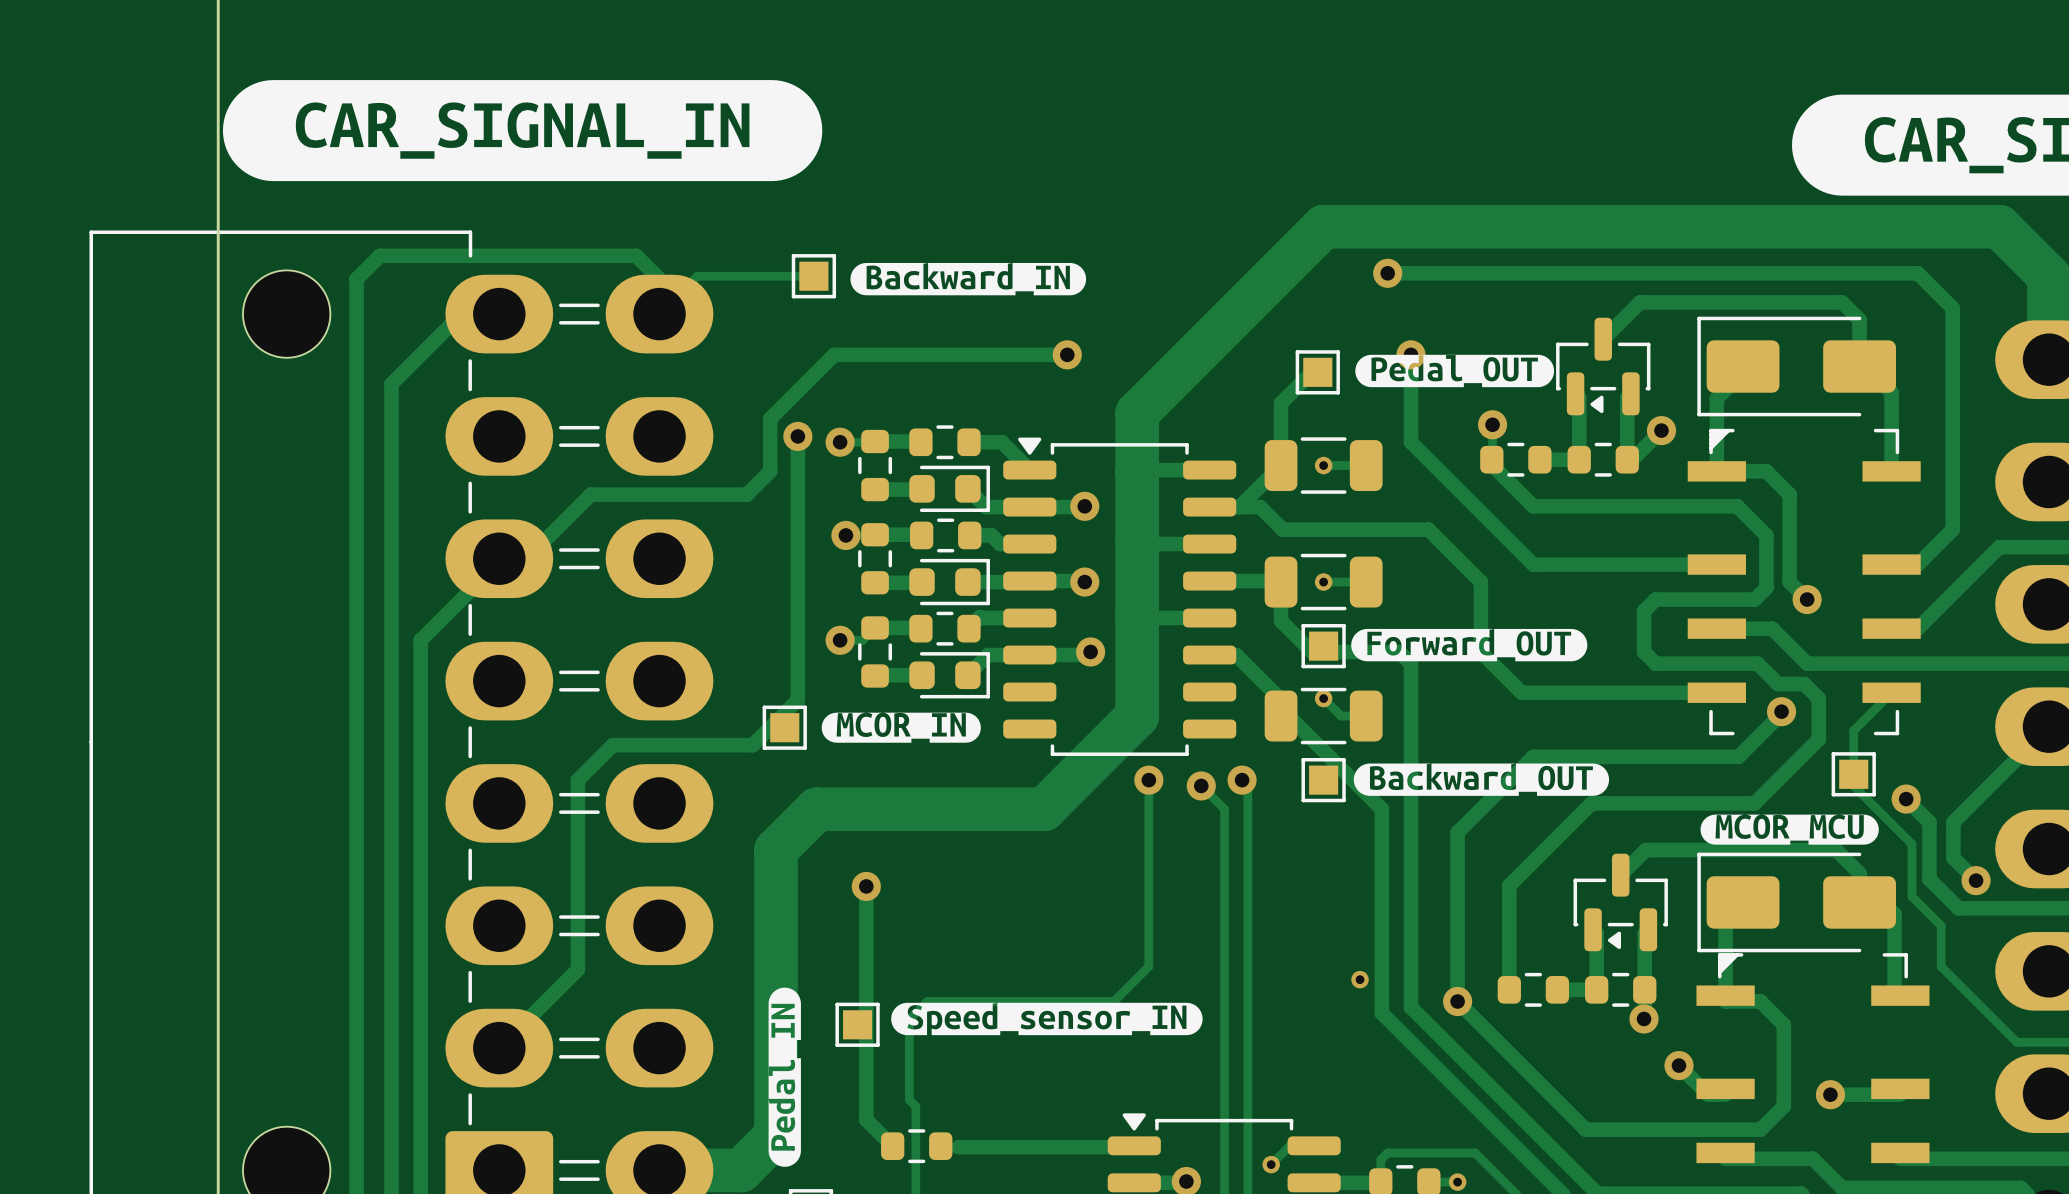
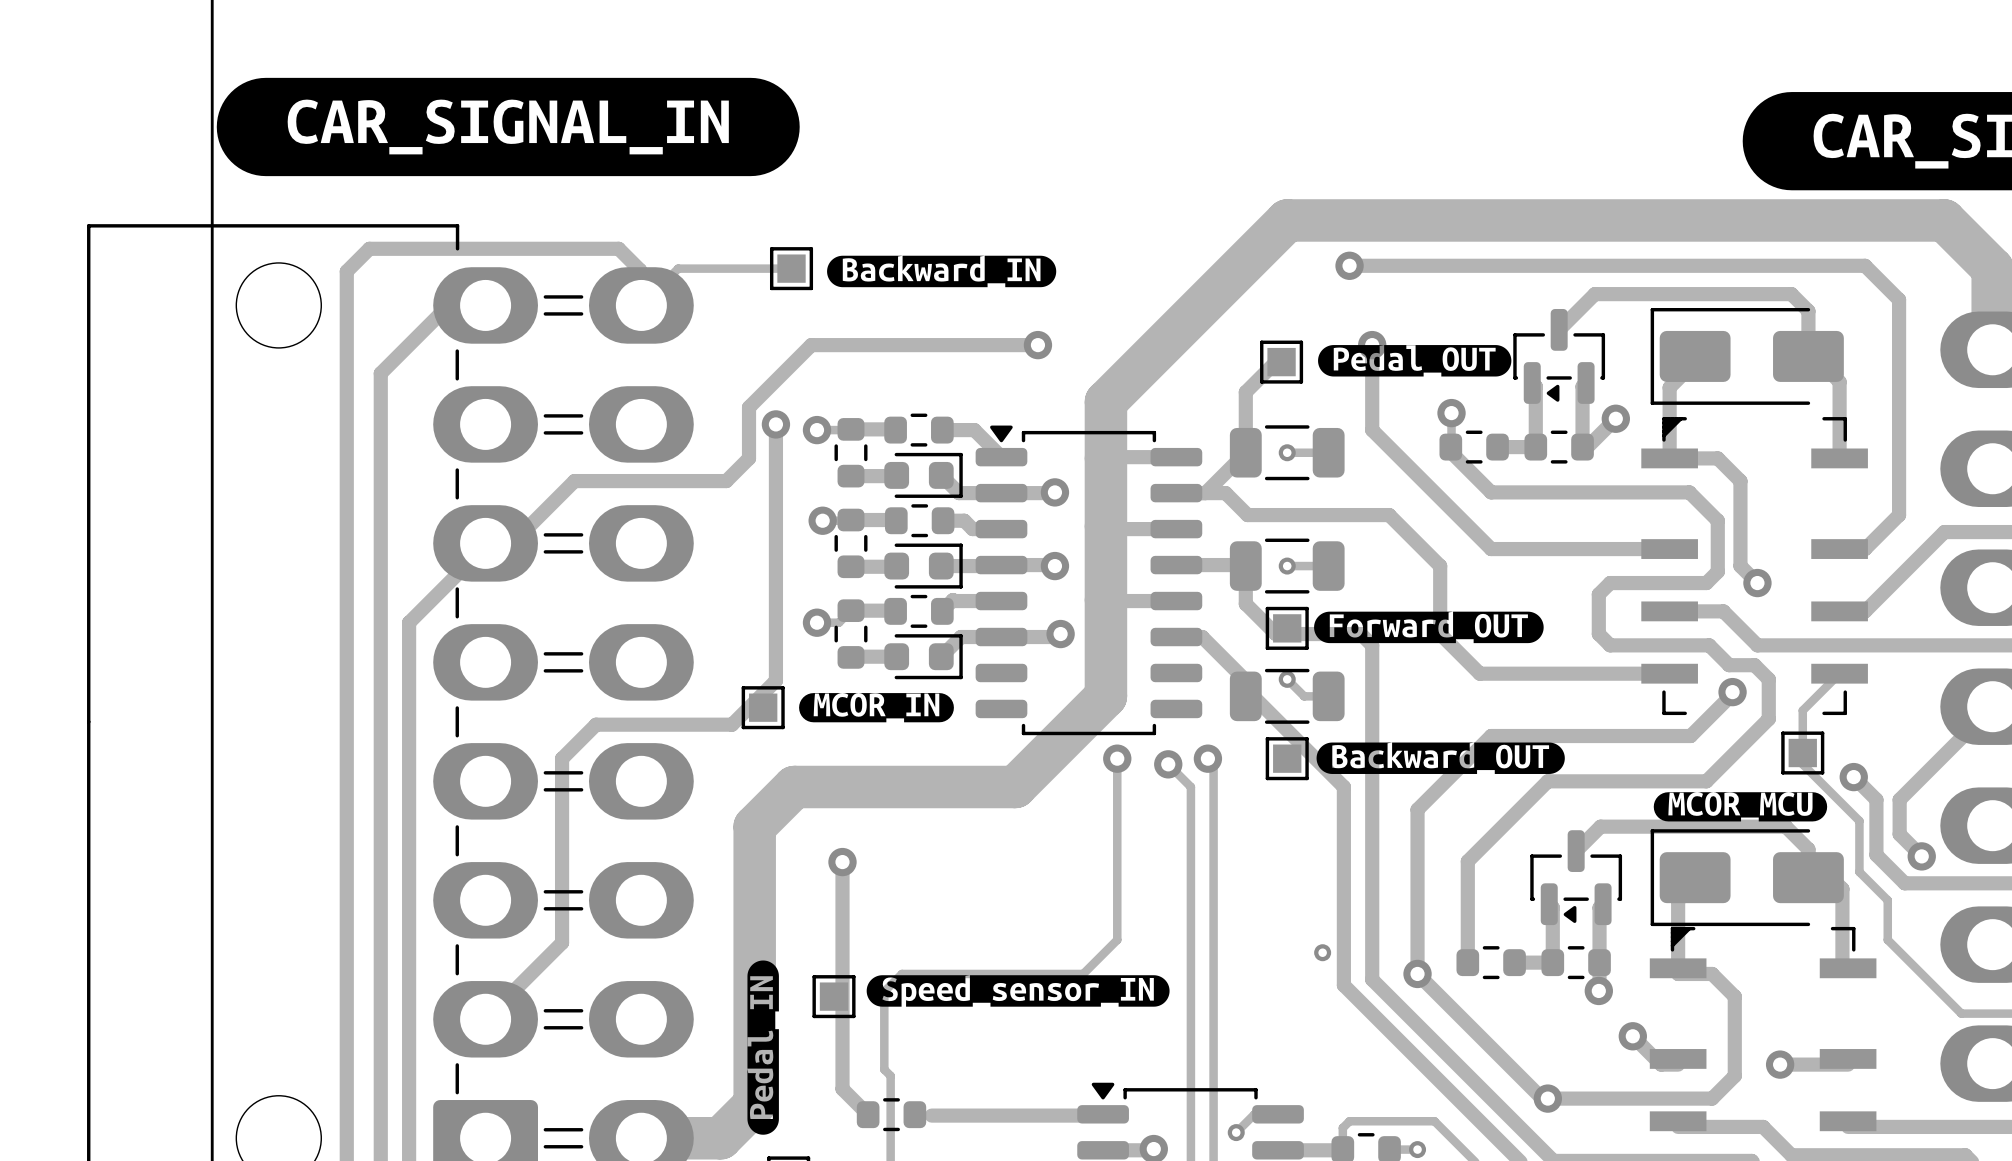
via: none -> (1547, 1098)

